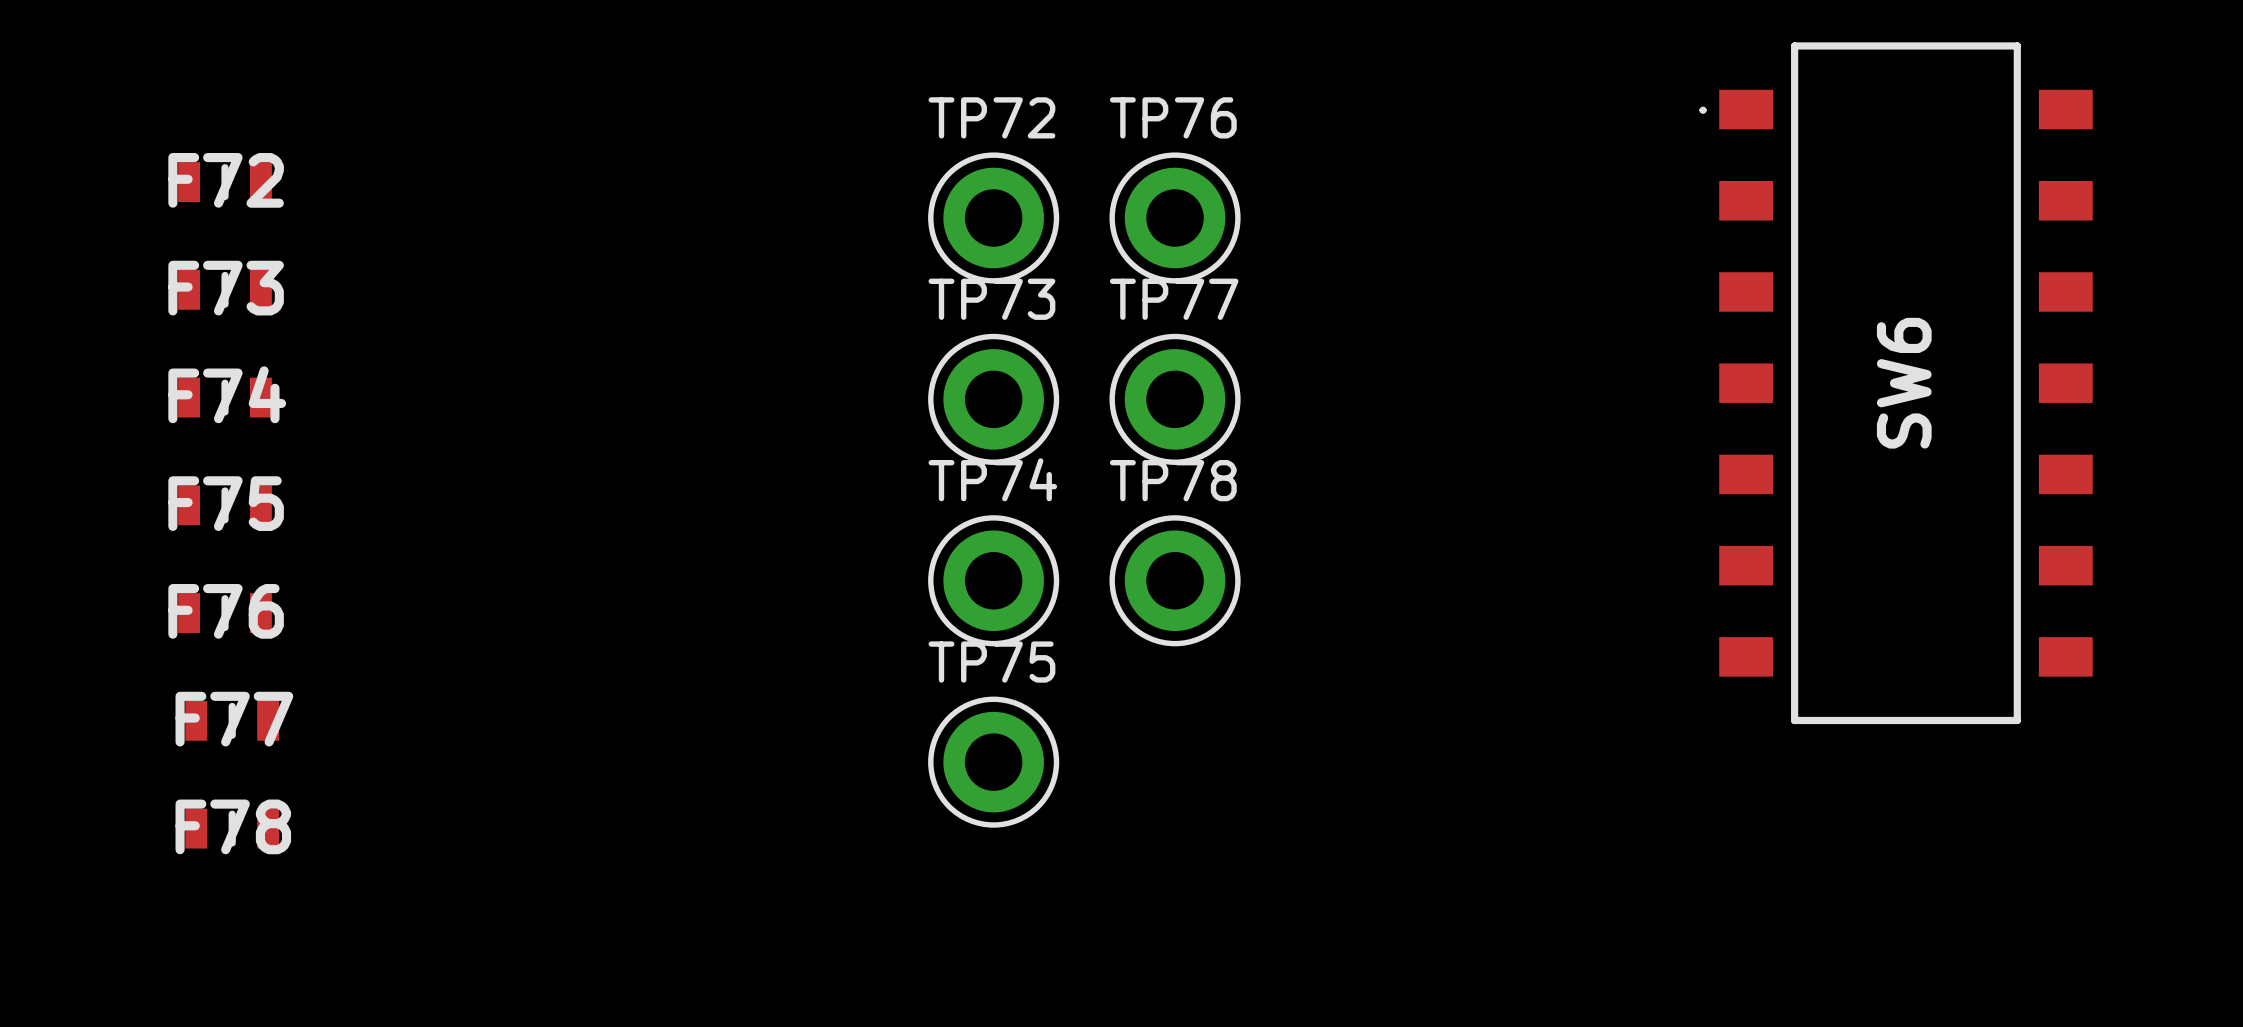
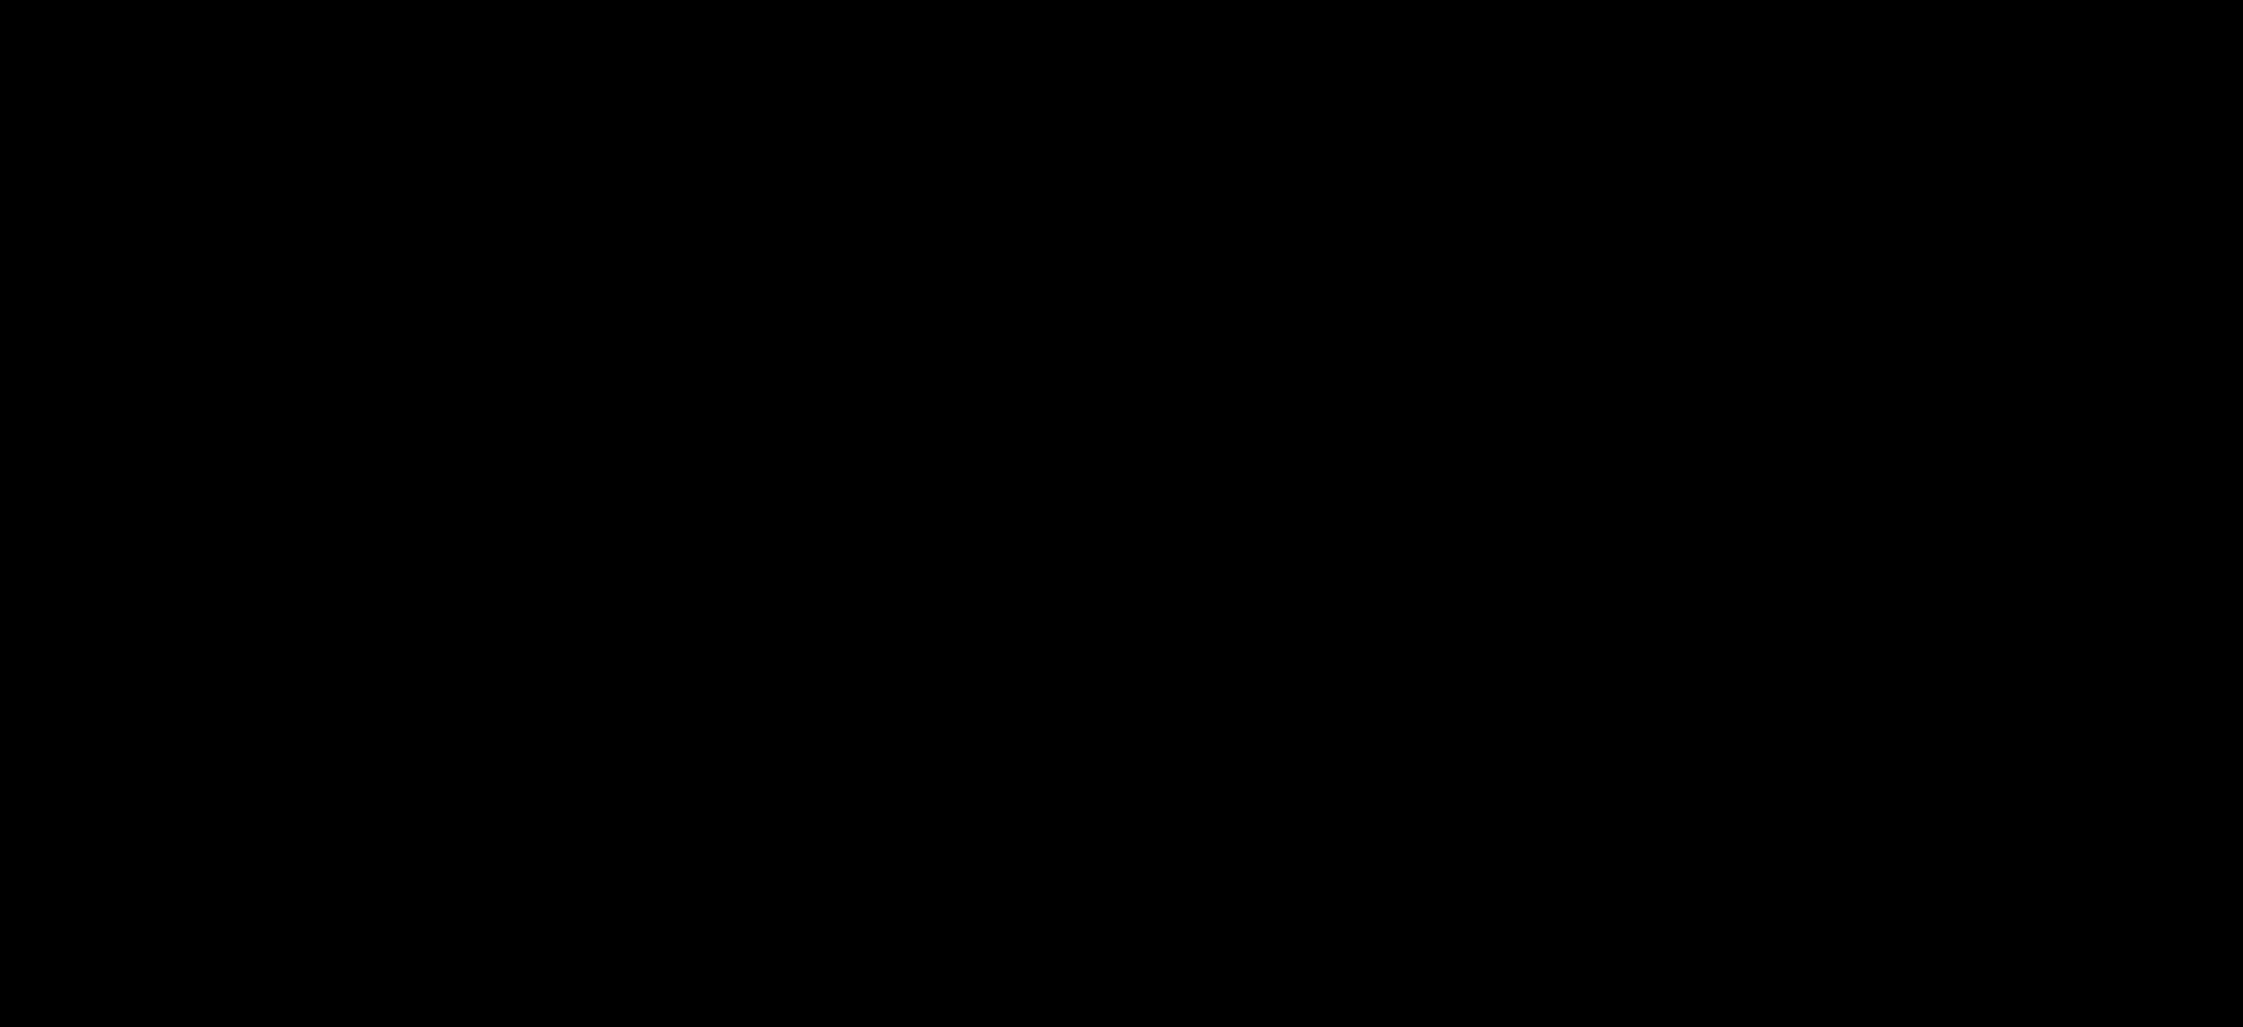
F72: (225, 182) -> none
TP72: (993, 217) -> none
TP76: (1175, 217) -> none
F73: (225, 289) -> none
SW6: (1896, 383) -> none
F74: (225, 397) -> none
TP73: (993, 399) -> none
TP77: (1175, 399) -> none
F75: (225, 505) -> none
TP74: (993, 580) -> none
TP78: (1175, 580) -> none
F76: (225, 613) -> none
F77: (232, 720) -> none
TP75: (993, 762) -> none
F78: (232, 828) -> none

